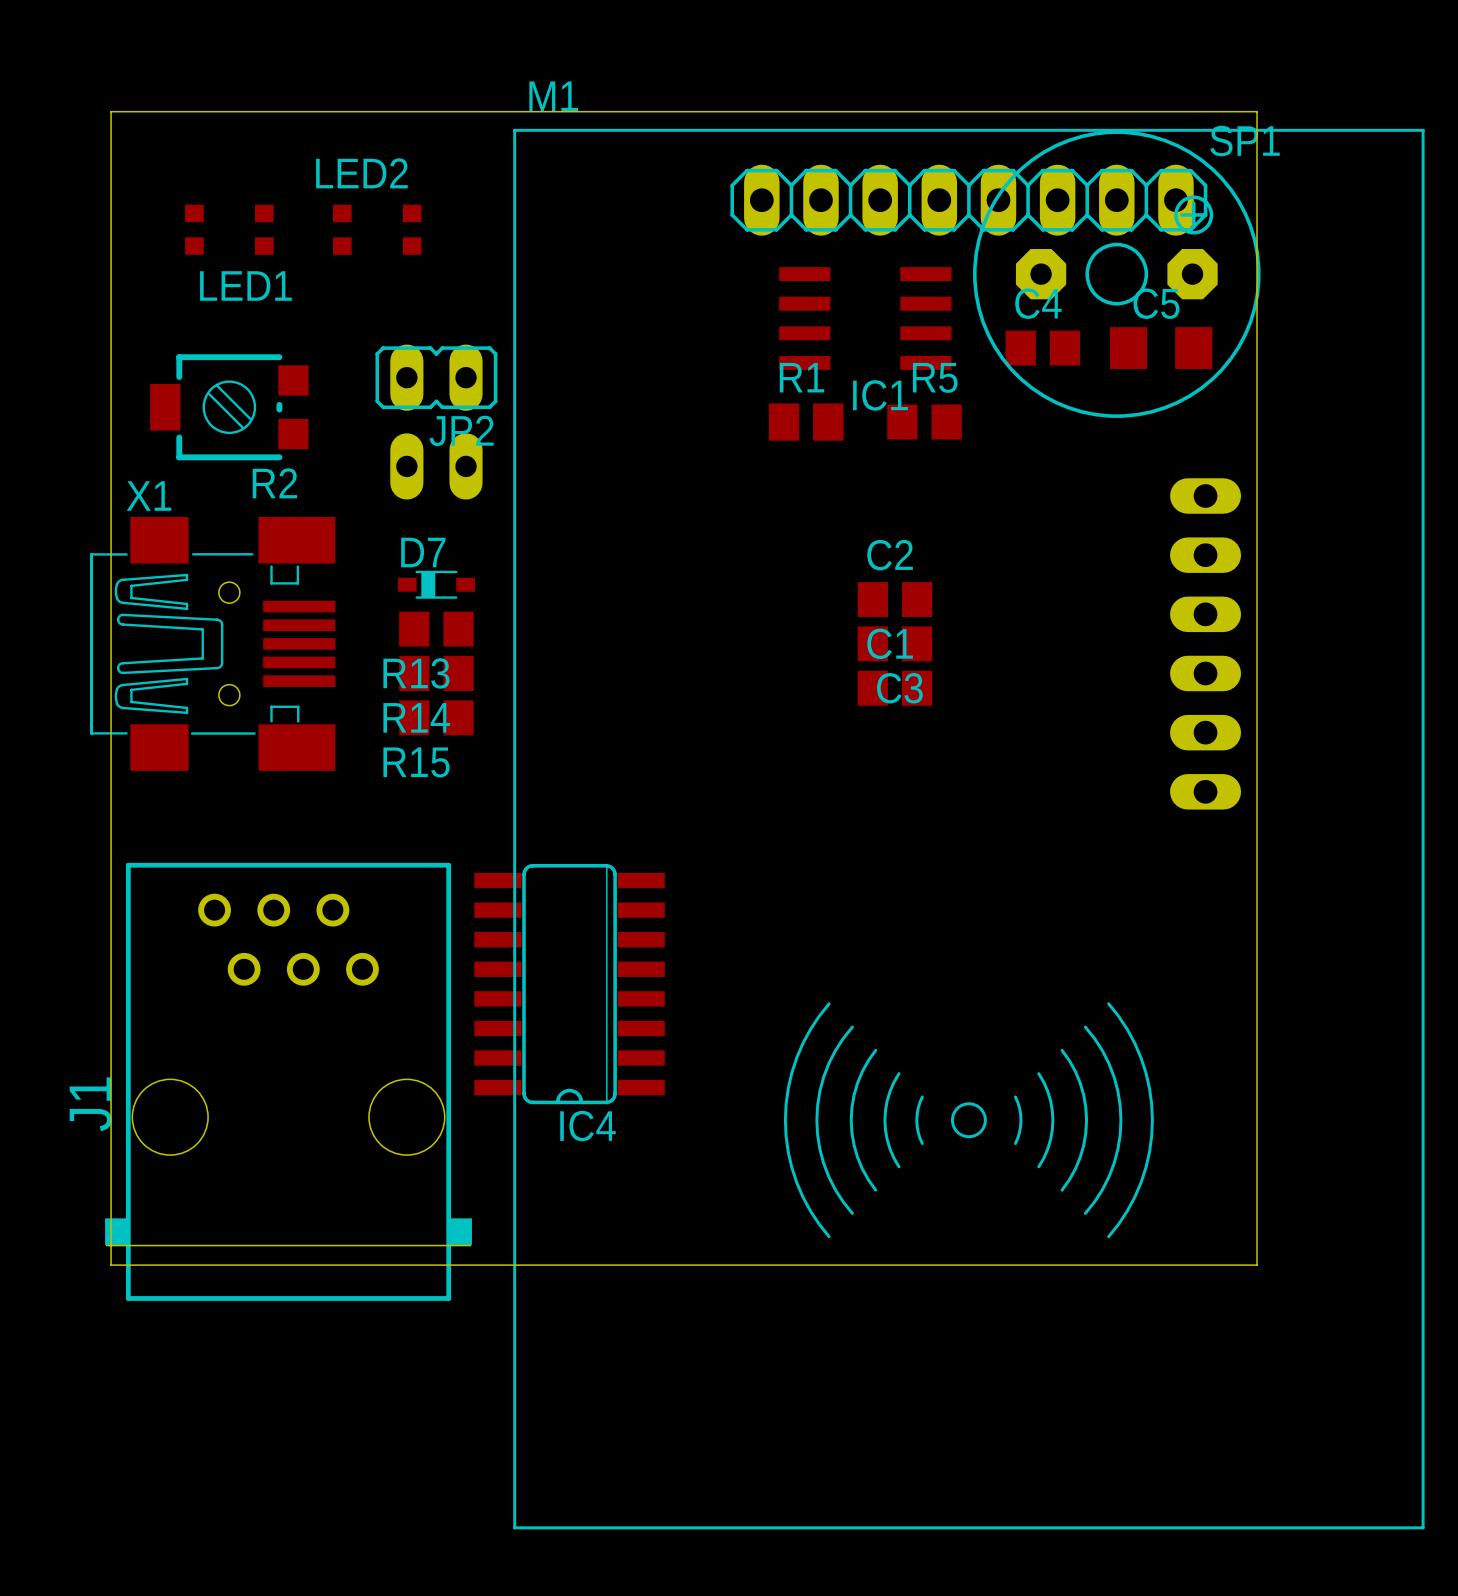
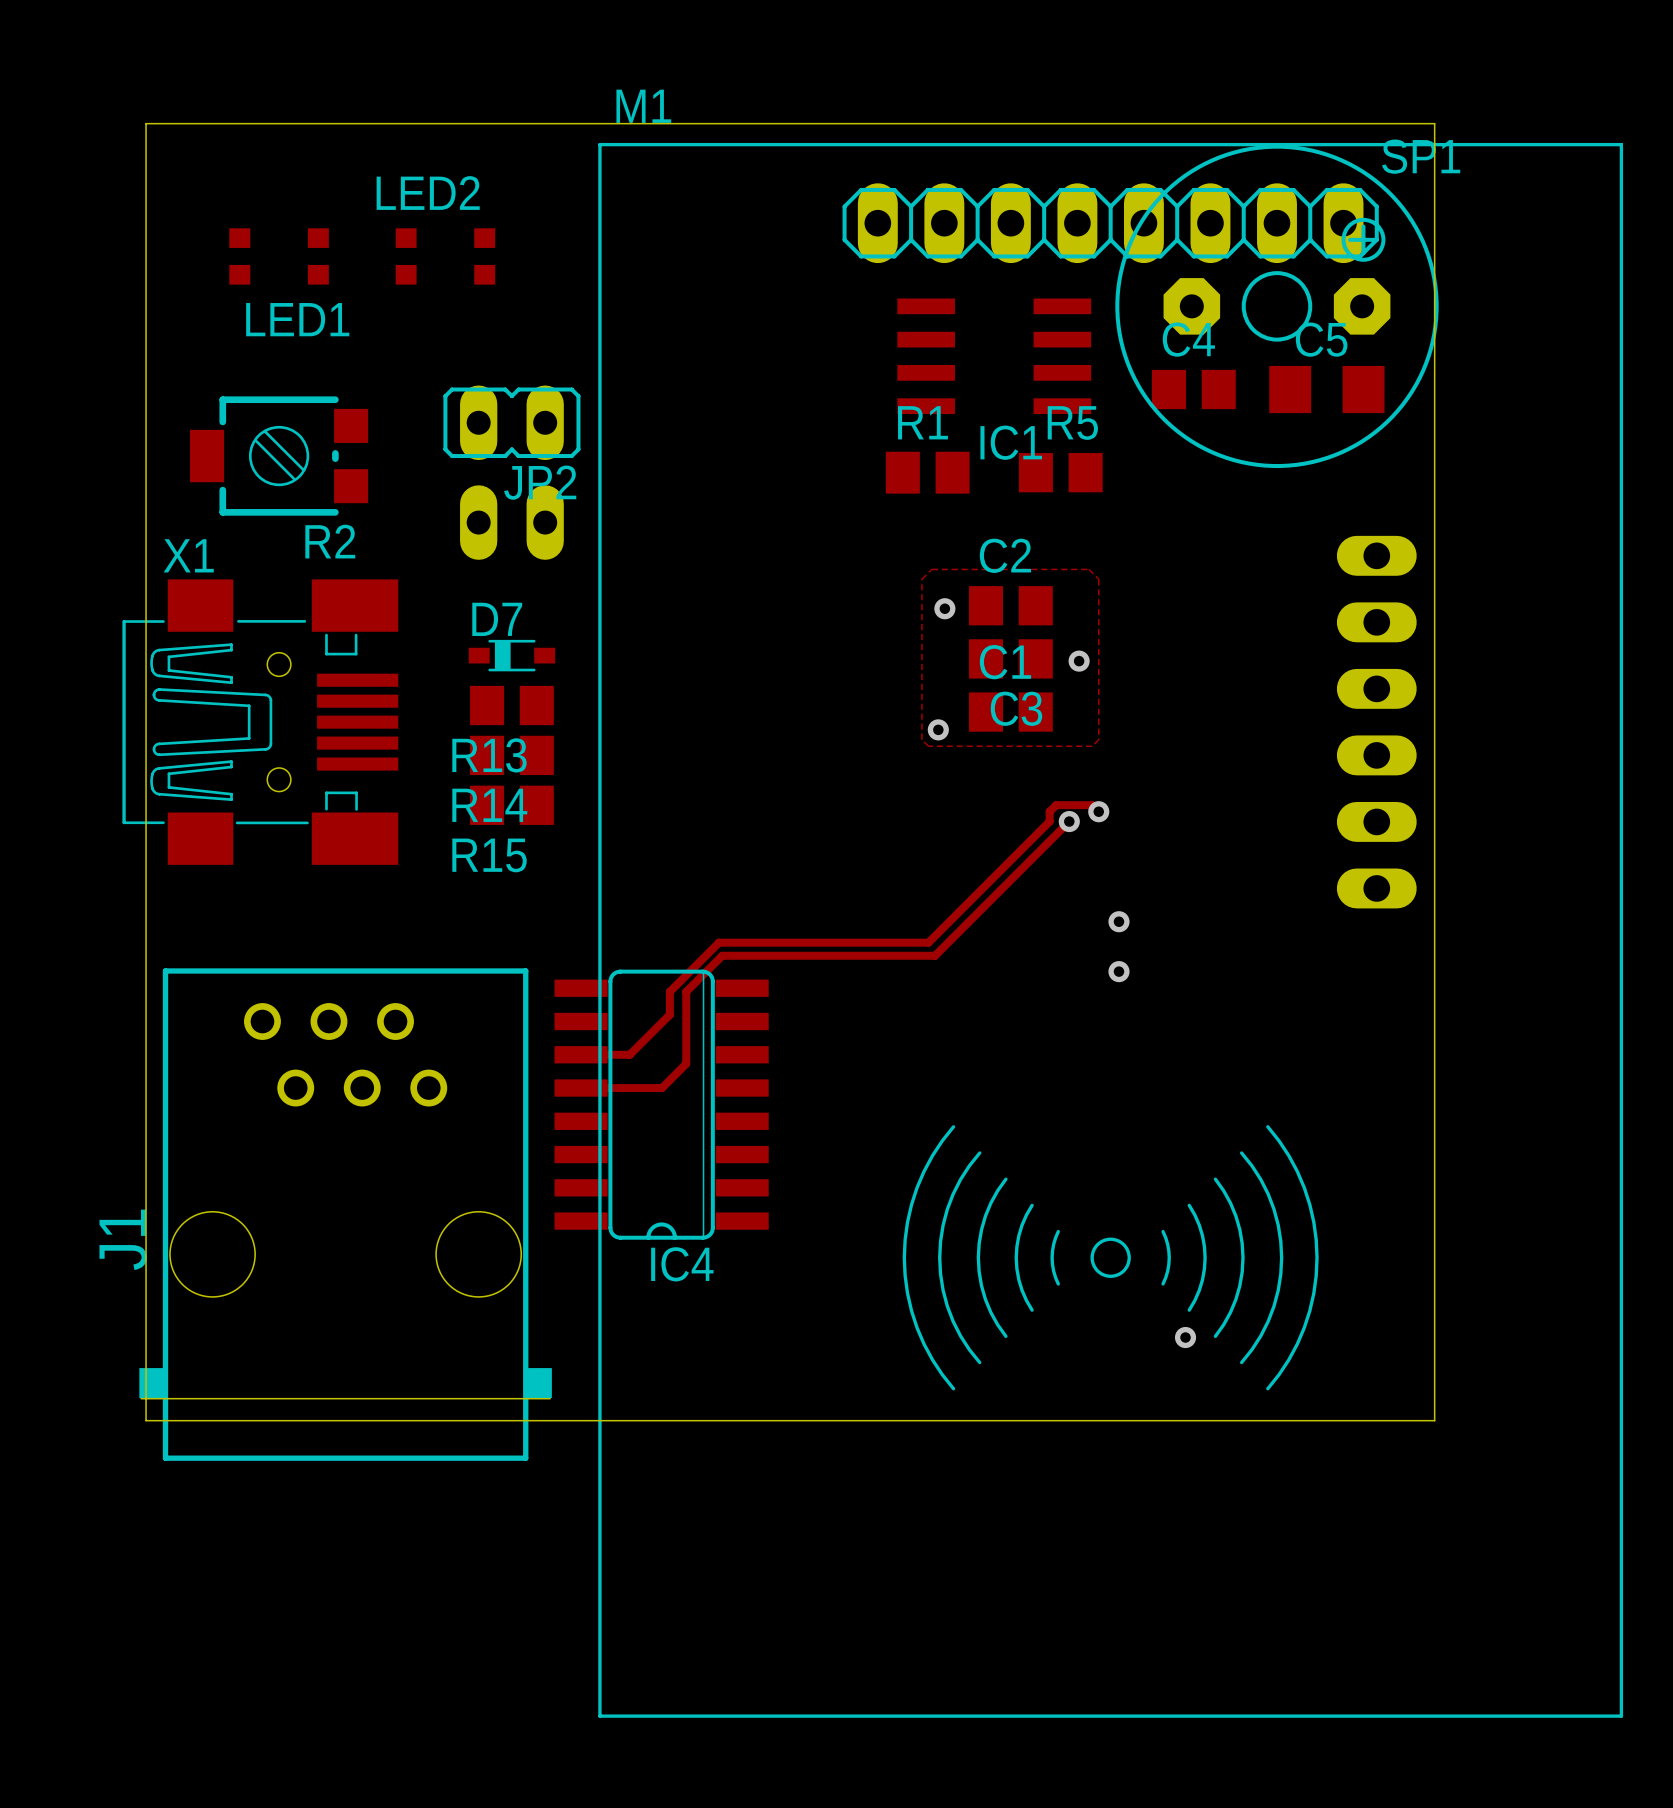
zone outline: none -> (931, 569) (921, 579) (921, 739) (928, 746) (1092, 746) (1098, 739) (1098, 579) (1088, 569) (931, 569)
via: none -> (944, 608)
via: none -> (1079, 661)
C2 position: (894, 599) -> (1010, 605)
C3 position: (894, 643) -> (1010, 658)
via: none -> (938, 729)
C1 position: (894, 688) -> (1010, 712)
track: none -> (1098, 811) (1092, 805) (1056, 805) (1049, 811) (1049, 821) (928, 942) (718, 942) (669, 991) (669, 1014) (629, 1054) (581, 1054)
via: none -> (1098, 811)
track: none -> (1069, 821) (935, 955) (722, 955) (686, 991) (686, 1063) (662, 1088) (581, 1088)
via: none -> (1069, 821)
via: none -> (1118, 921)
via: none -> (1118, 971)
via: none -> (1185, 1337)

